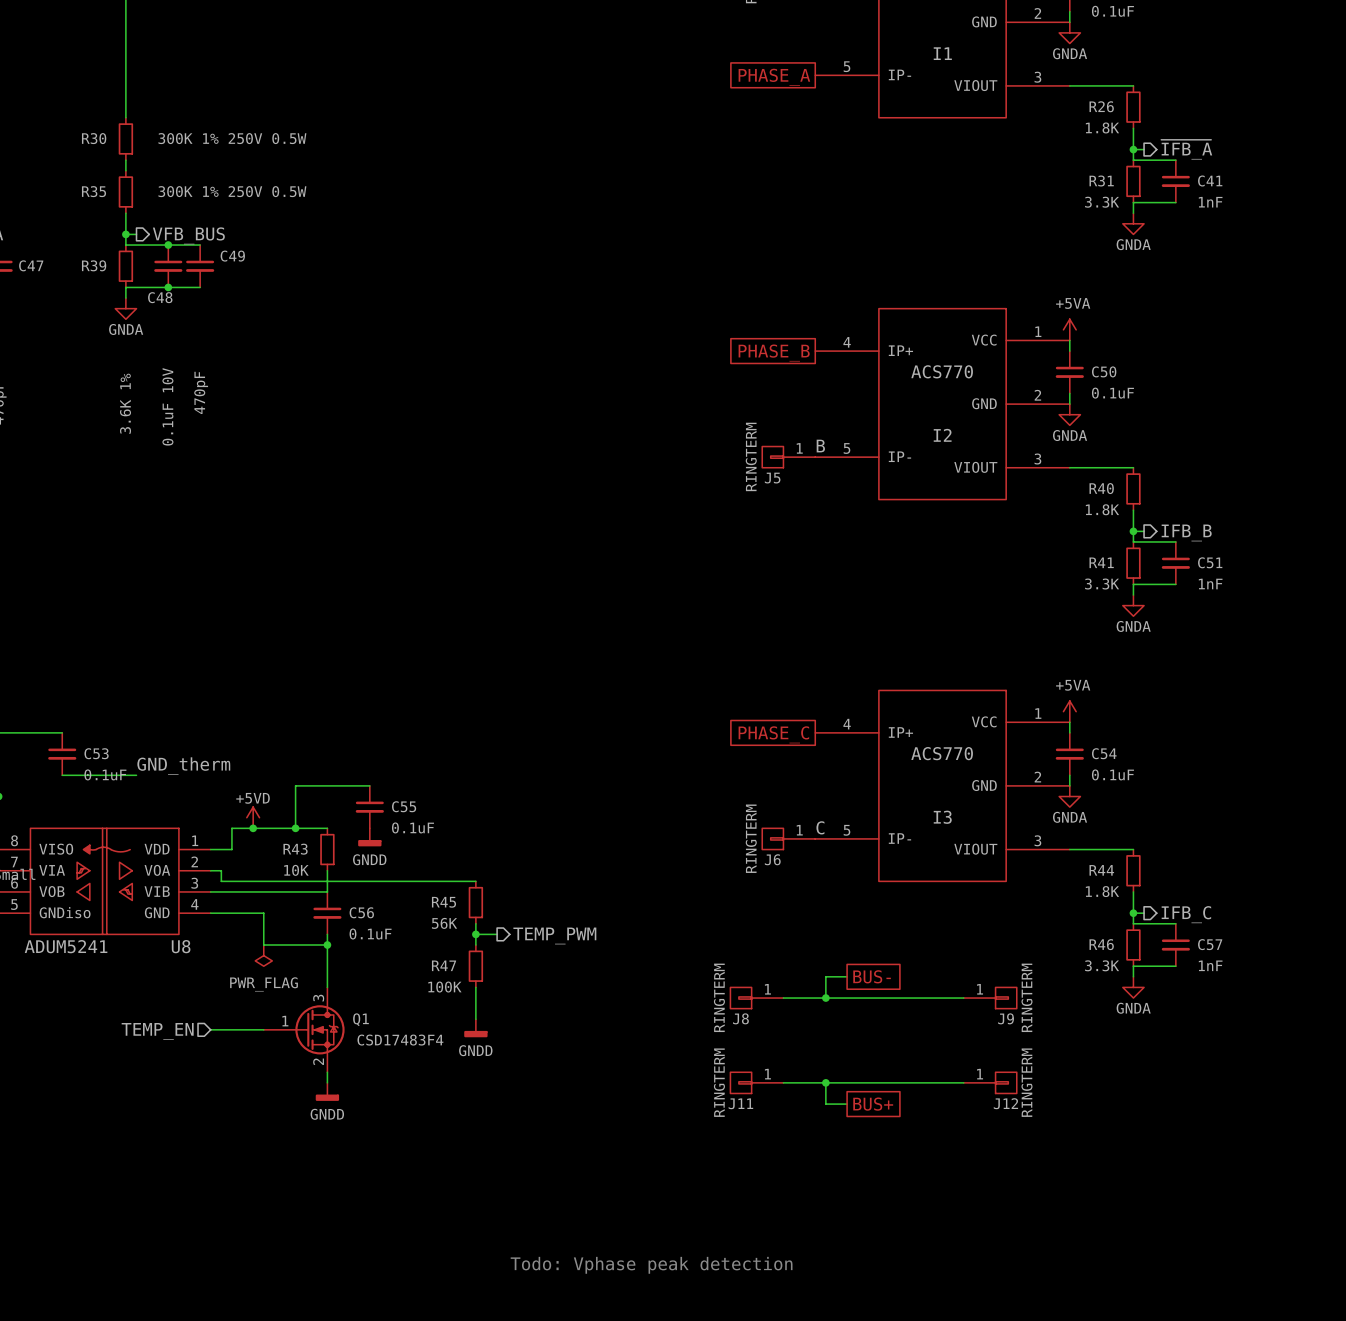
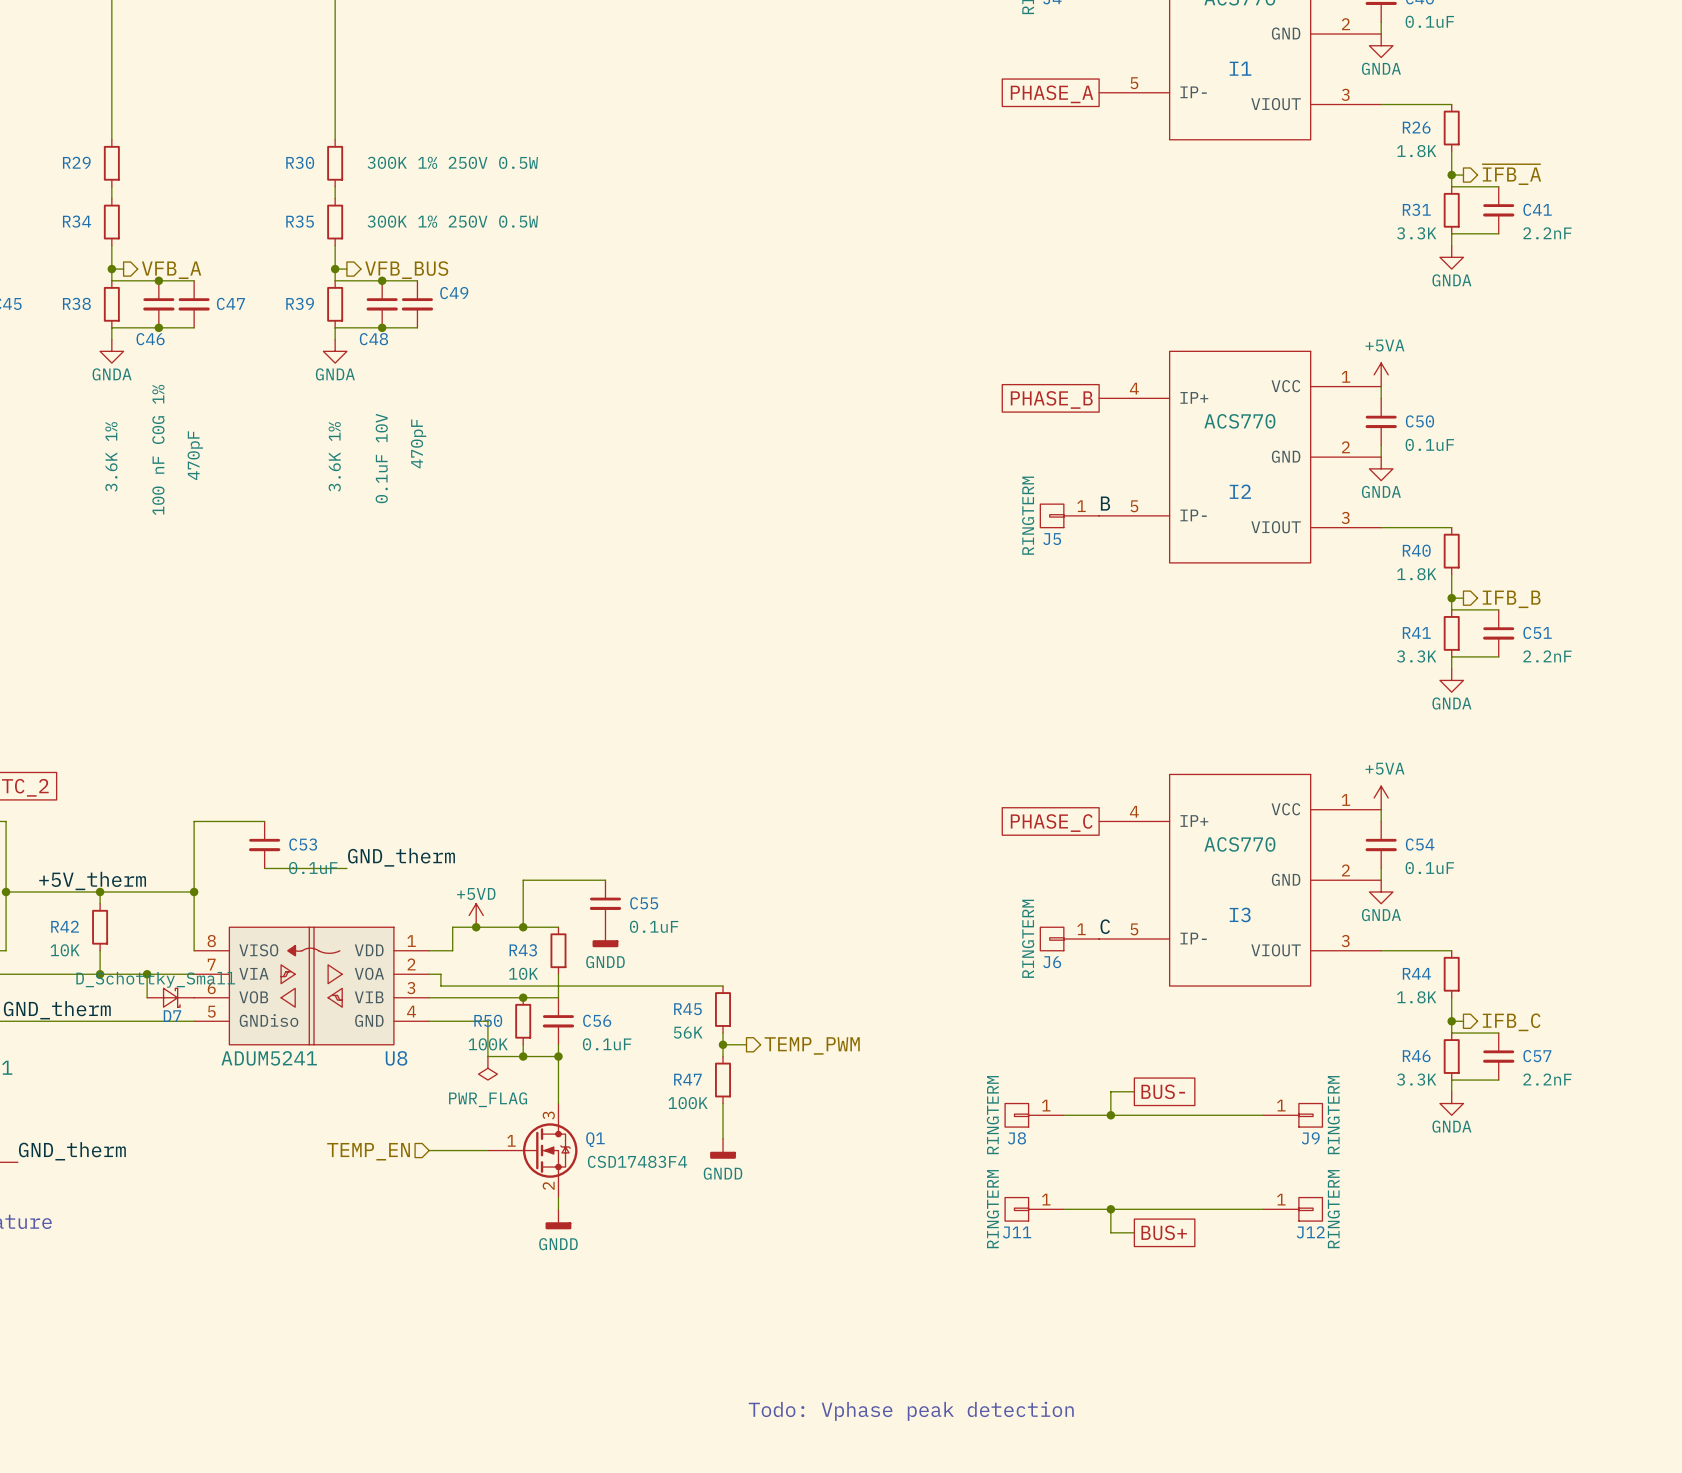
C41 value: 1nF (1210, 202) -> 2.2nF (1547, 233)
C51 value: 1nF (1210, 584) -> 2.2nF (1547, 656)
junction: none -> (523, 997)
R50: none -> 100K (523, 1021)
wire: none -> (523, 1044) (523, 1056)
junction: none -> (523, 1056)
C57 value: 1nF (1210, 965) -> 2.2nF (1547, 1079)

